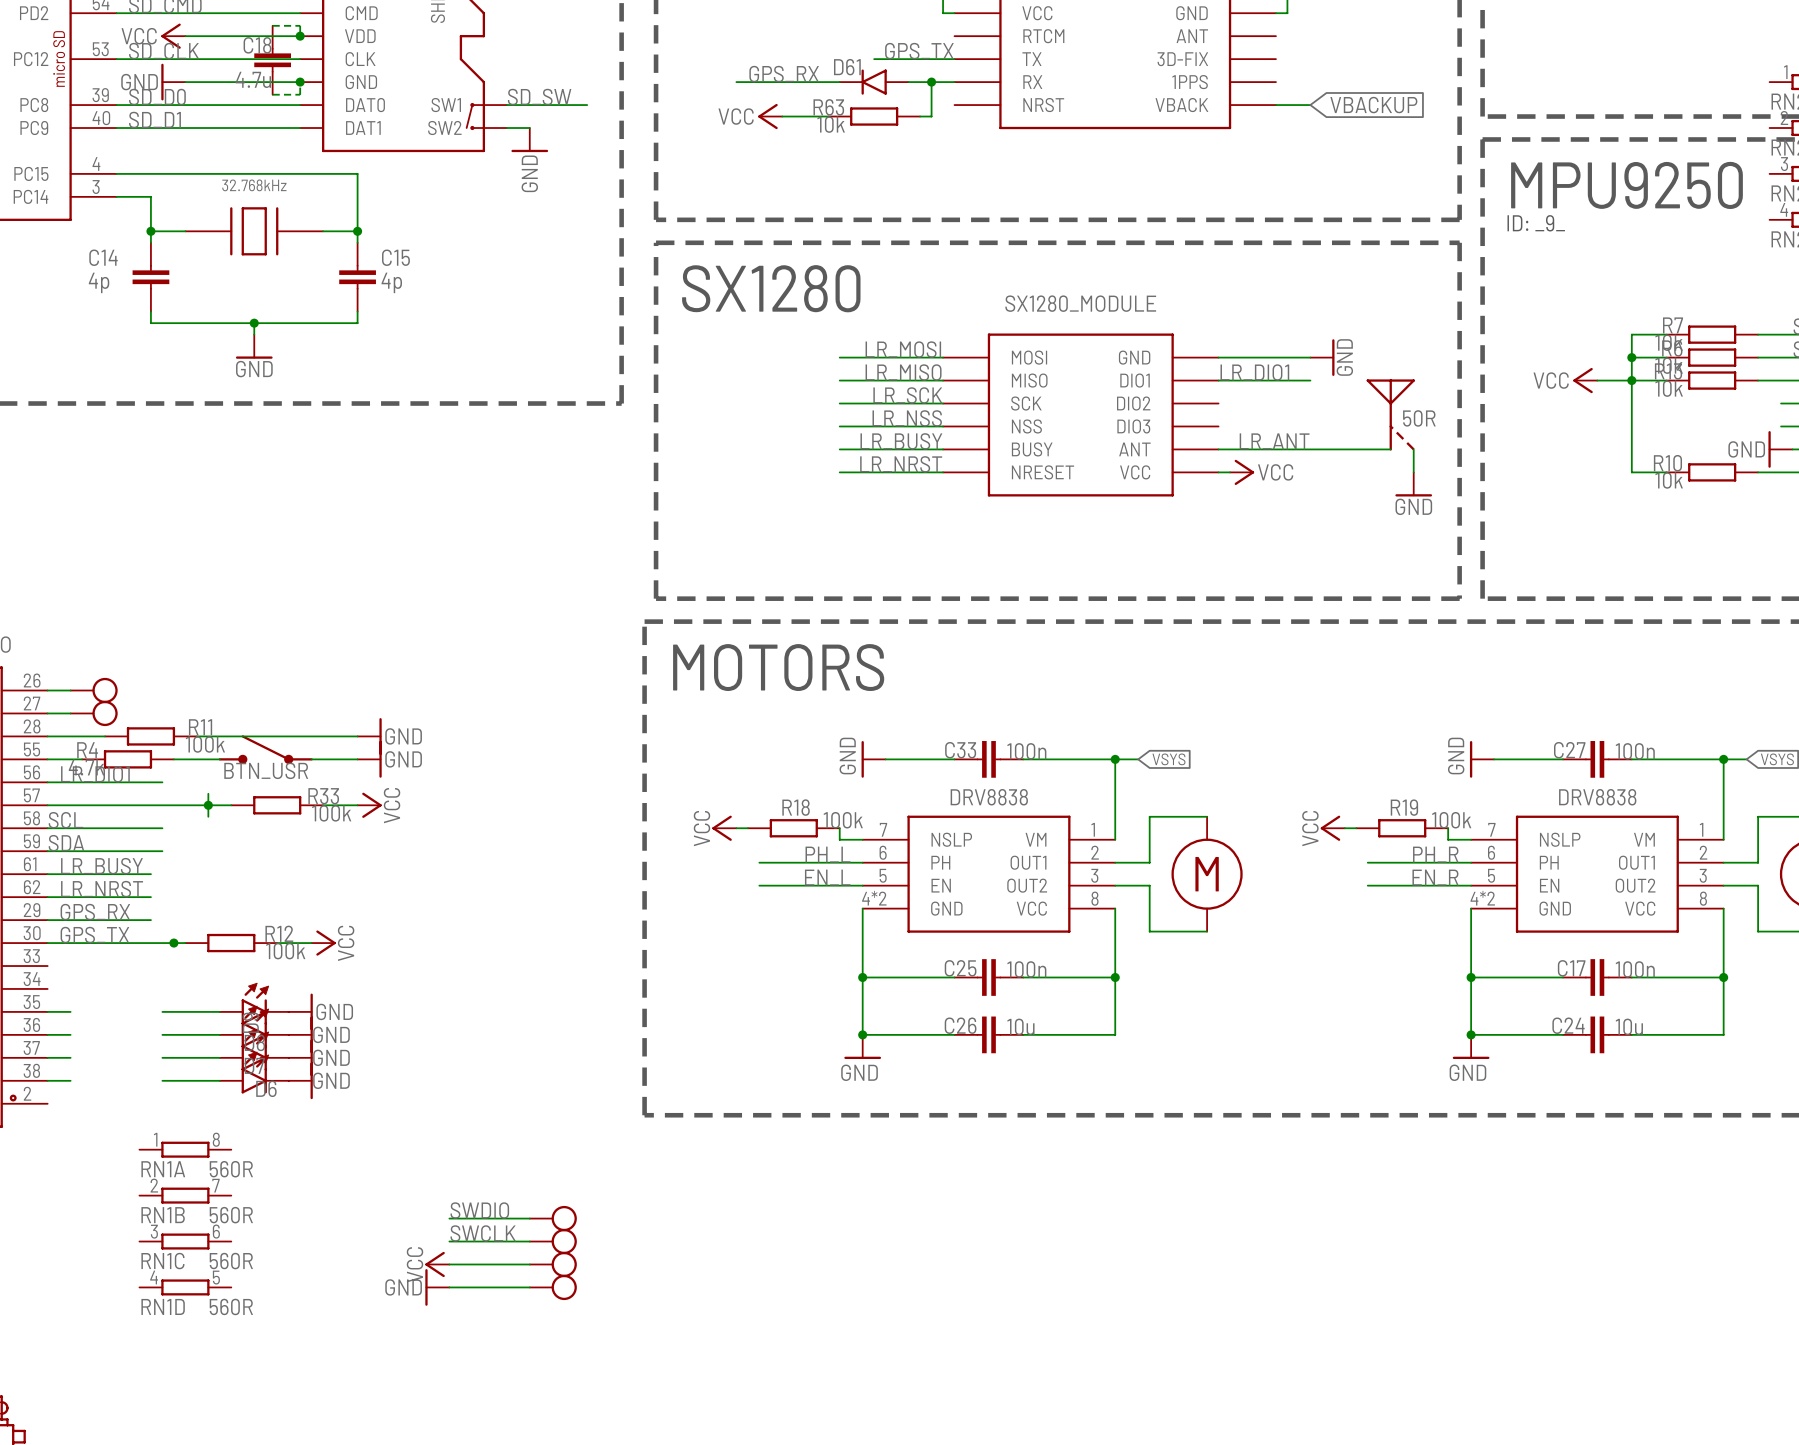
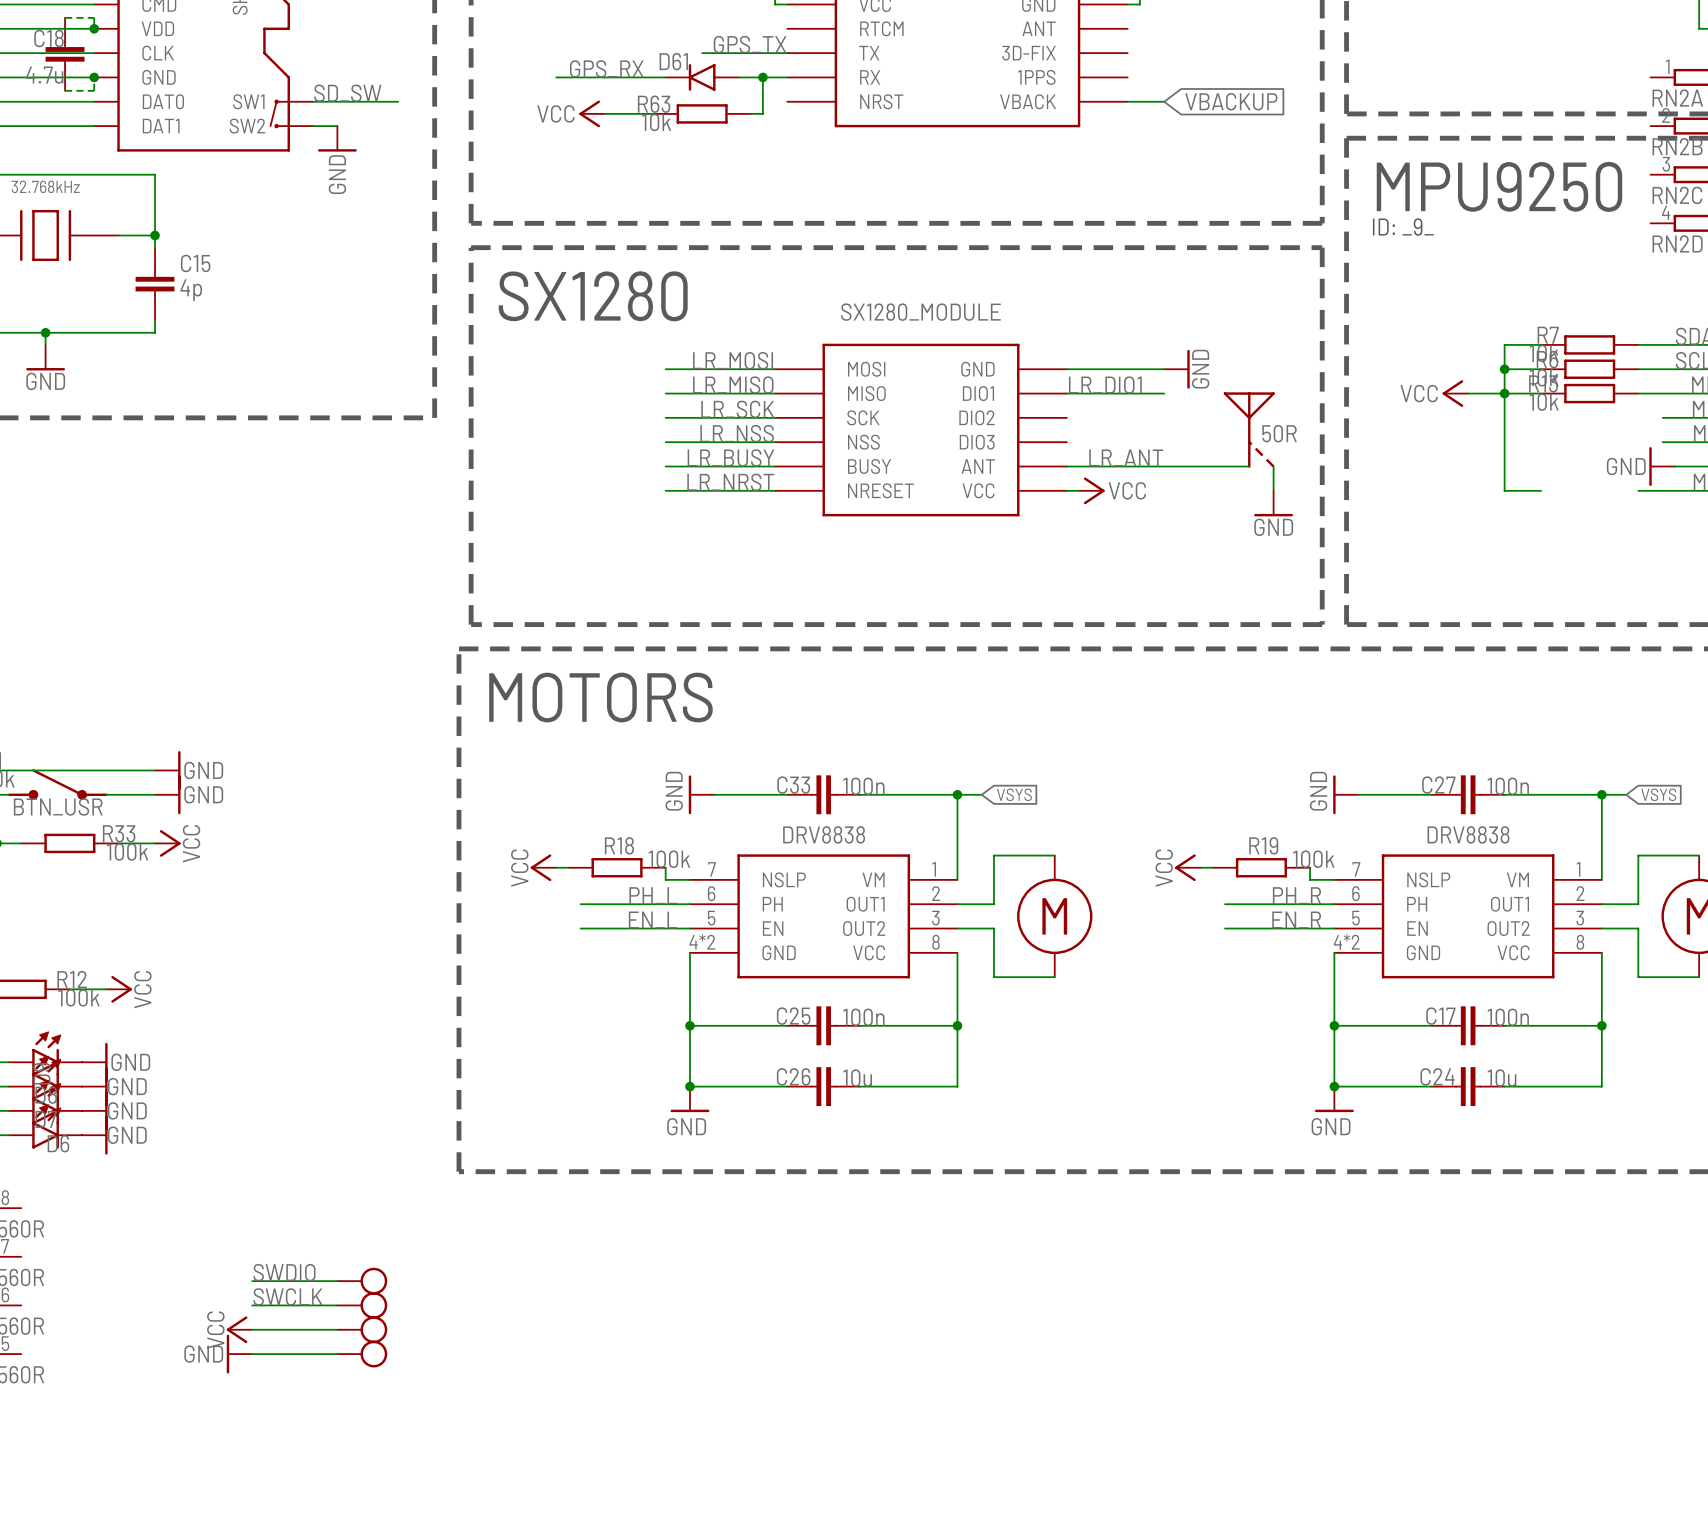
R10: 10k (1712, 472) -> none

